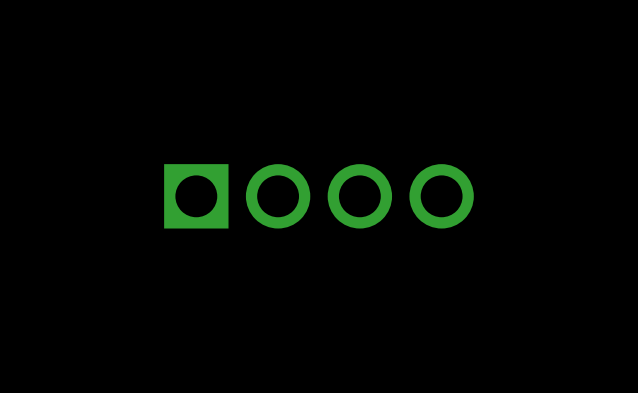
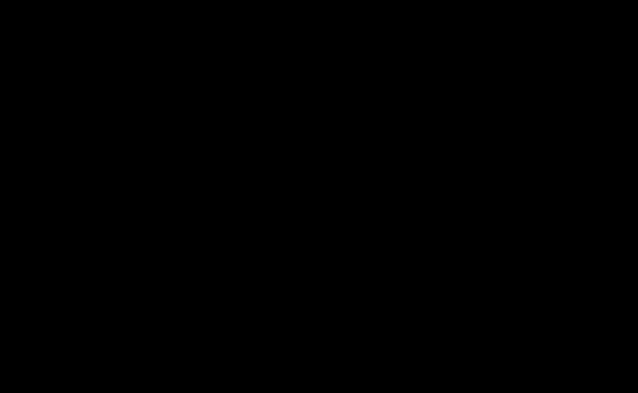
part: (318, 196) -> none

